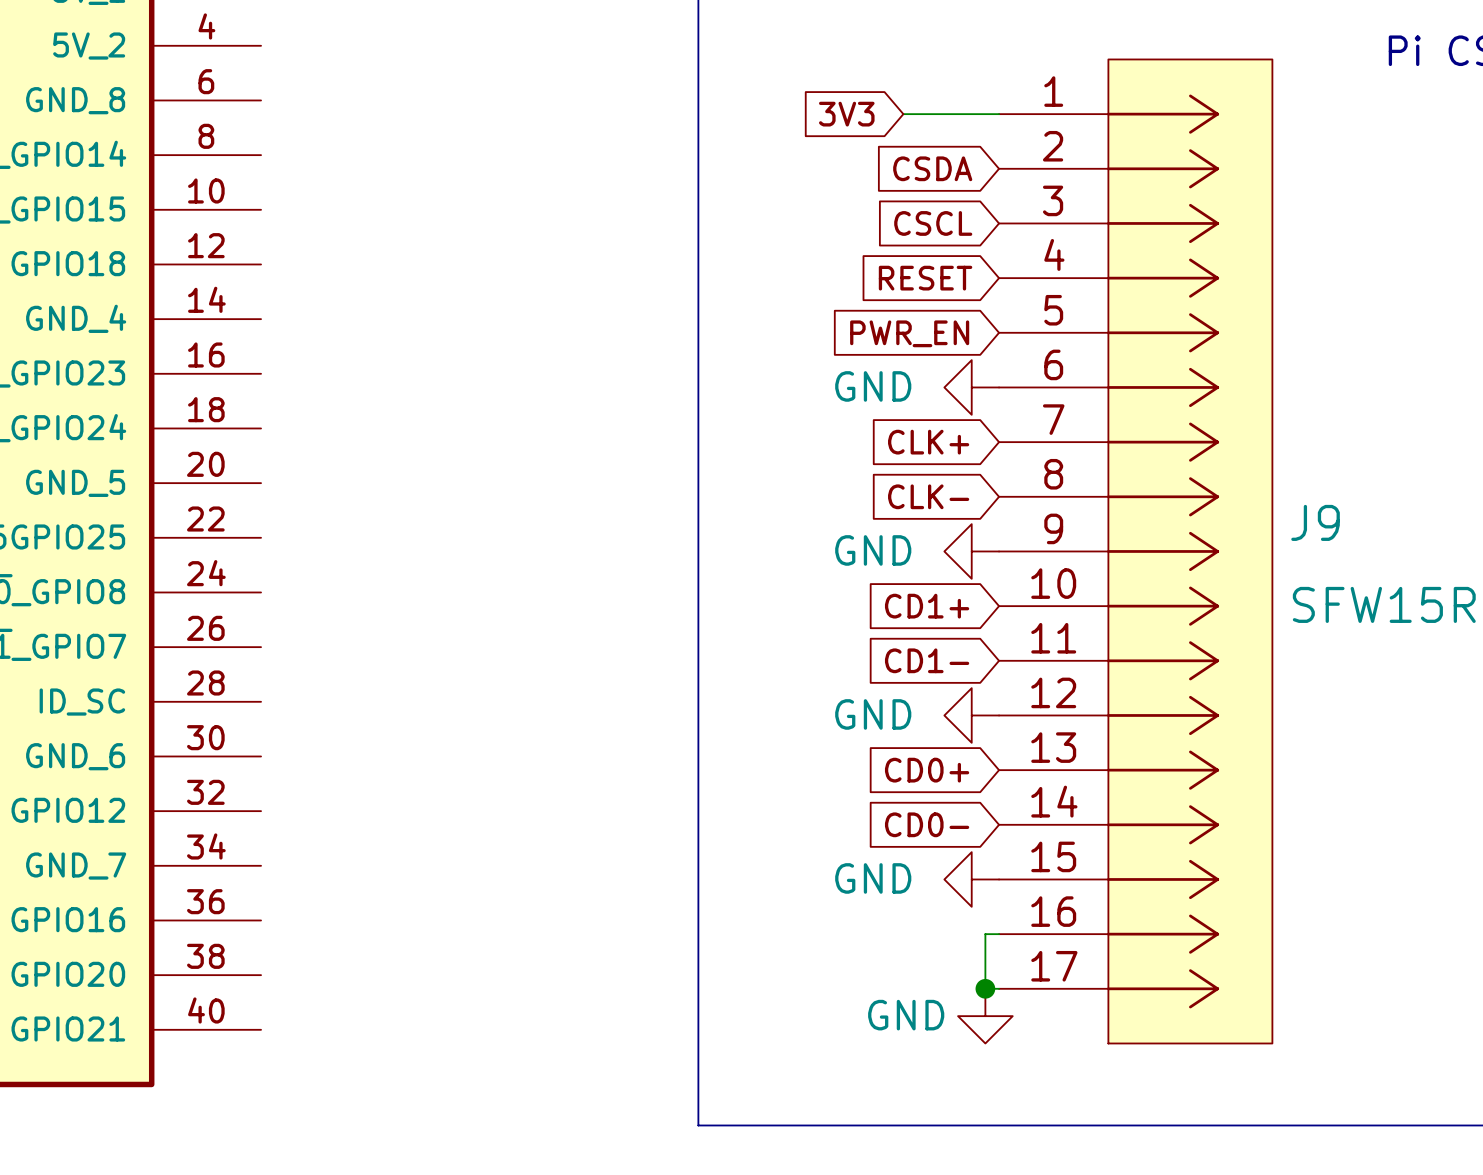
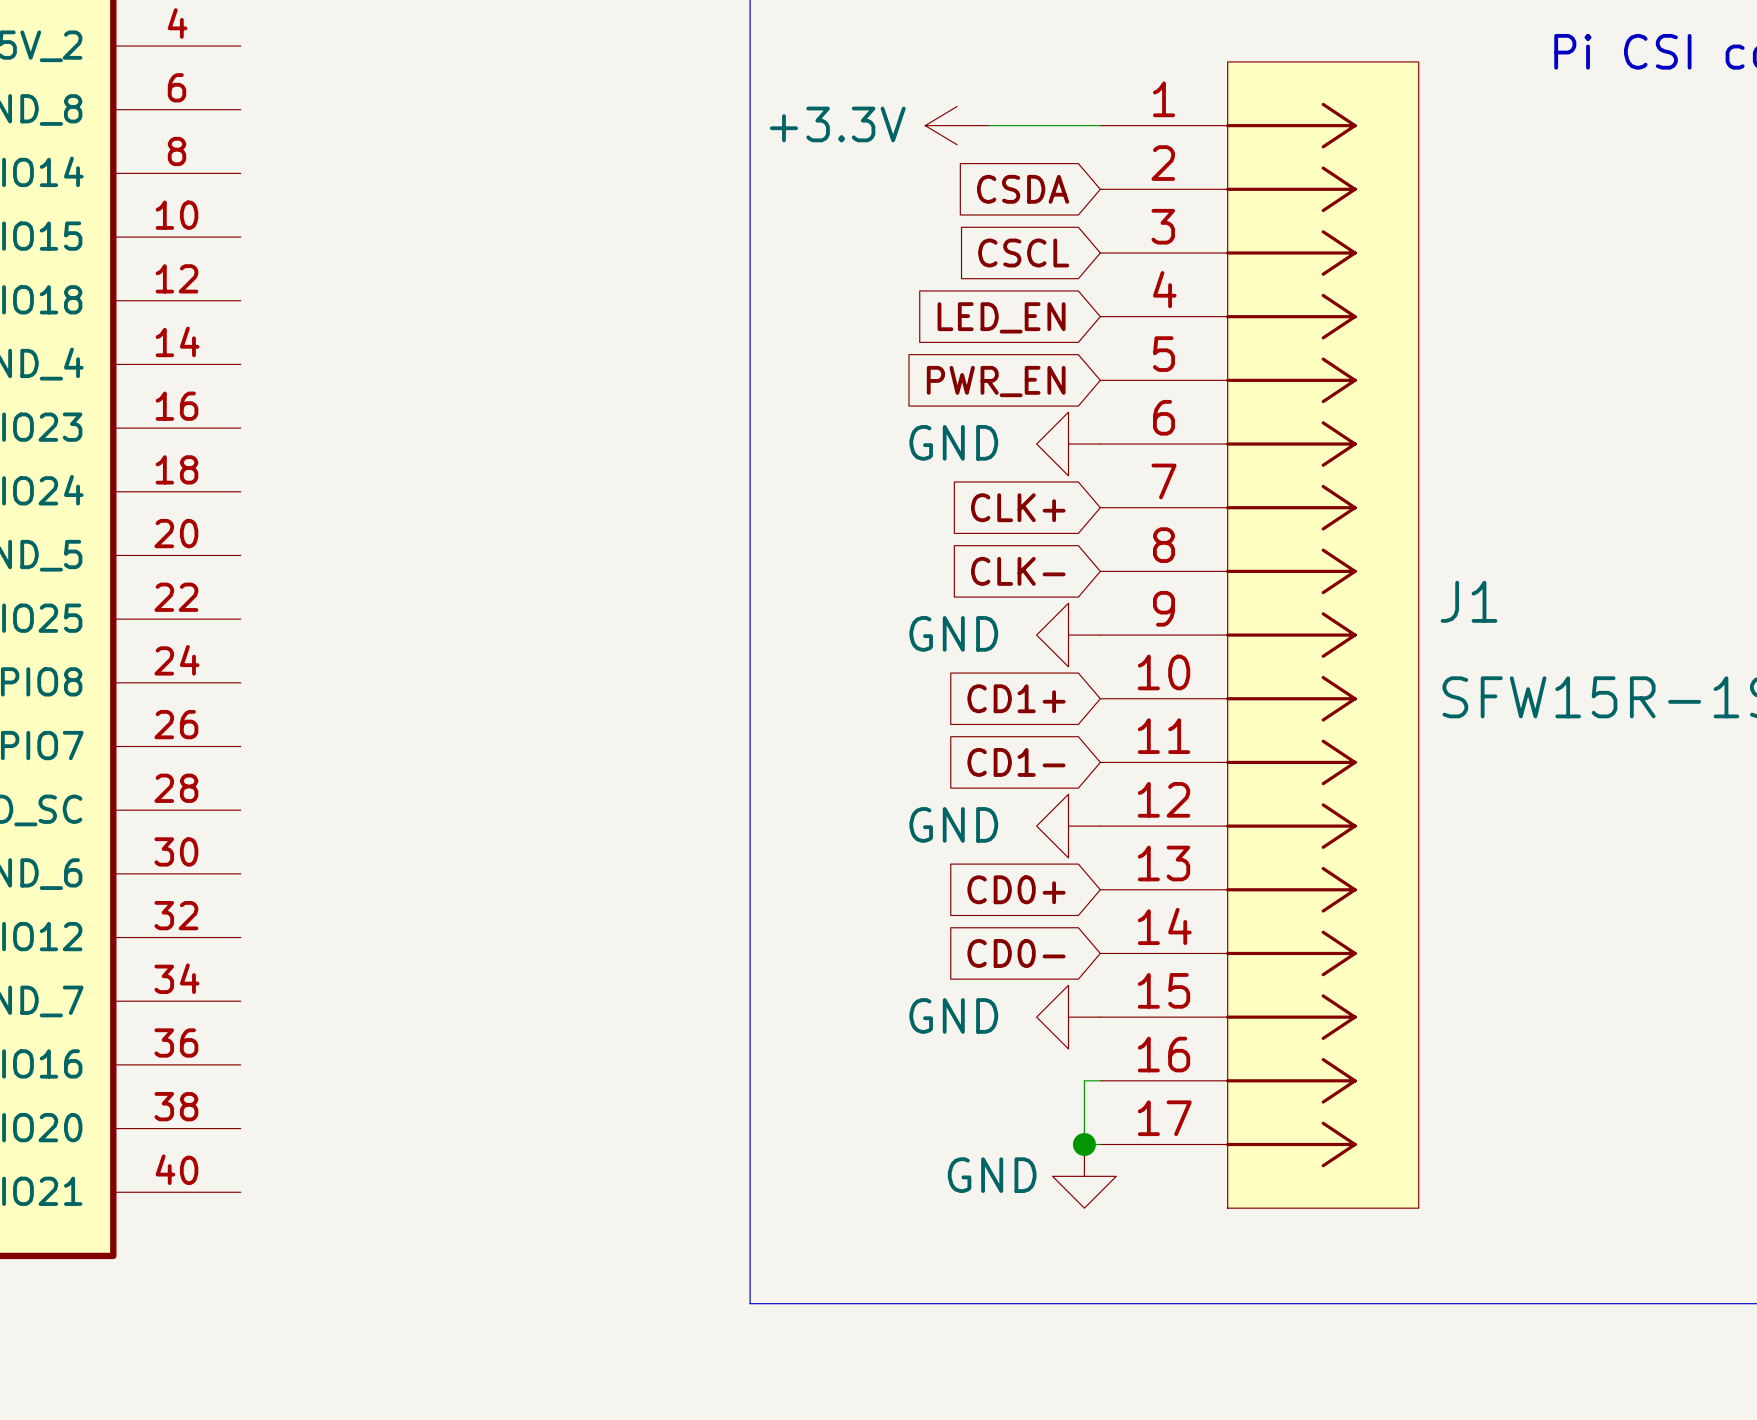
global label: 3V3 (846, 114) -> none
power symbol: none -> +3.3V (957, 125)
global label: RESET (925, 278) -> LED_EN (1001, 317)
J9 name: J9 (1315, 522) -> J1 (1469, 601)

